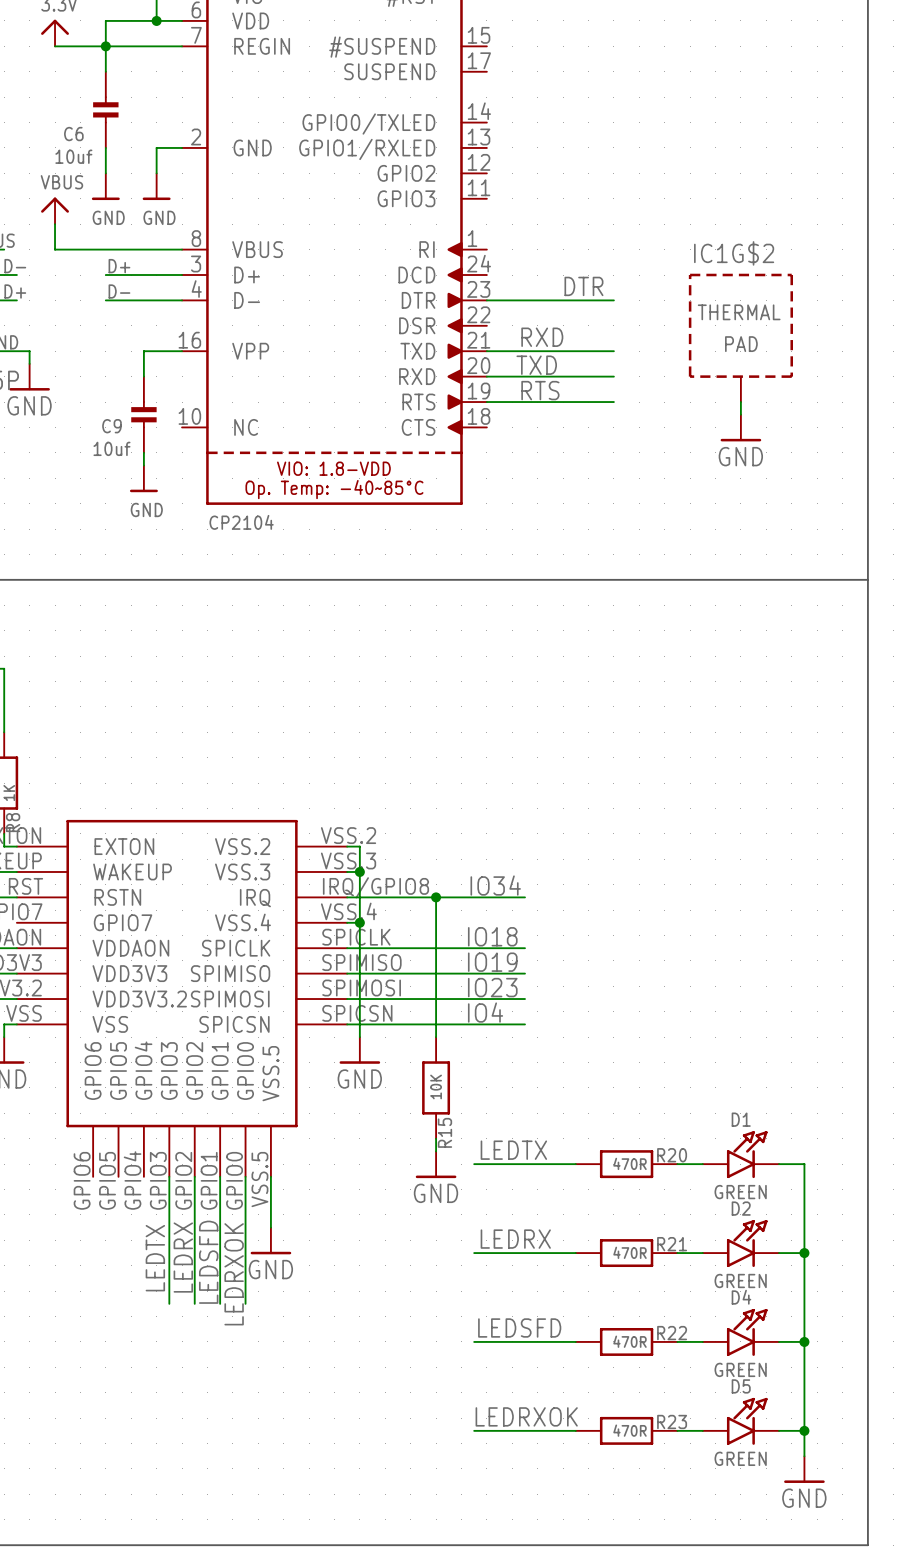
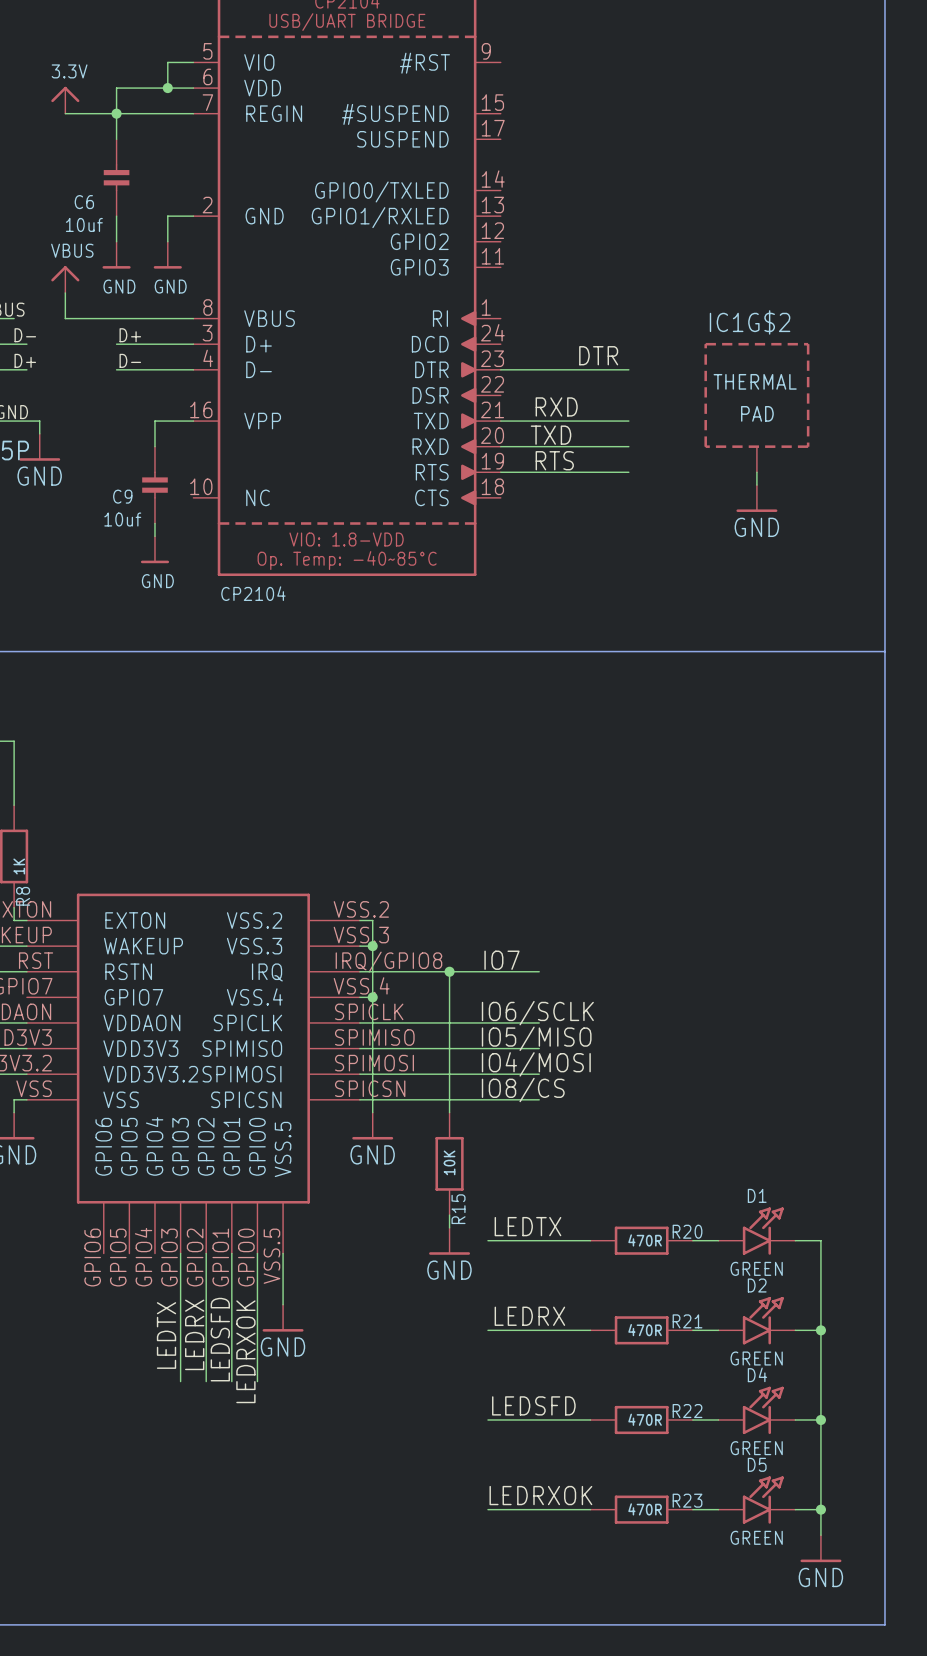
label: IO34 (495, 885) -> IO7 (501, 960)
label: IO18 (492, 936) -> IO6/SCLK (537, 1013)
label: IO19 (492, 962) -> IO5/MISO (536, 1038)
label: IO23 (492, 987) -> IO4/MOSI (536, 1064)
label: IO4 (485, 1012) -> IO8/CS (523, 1090)

